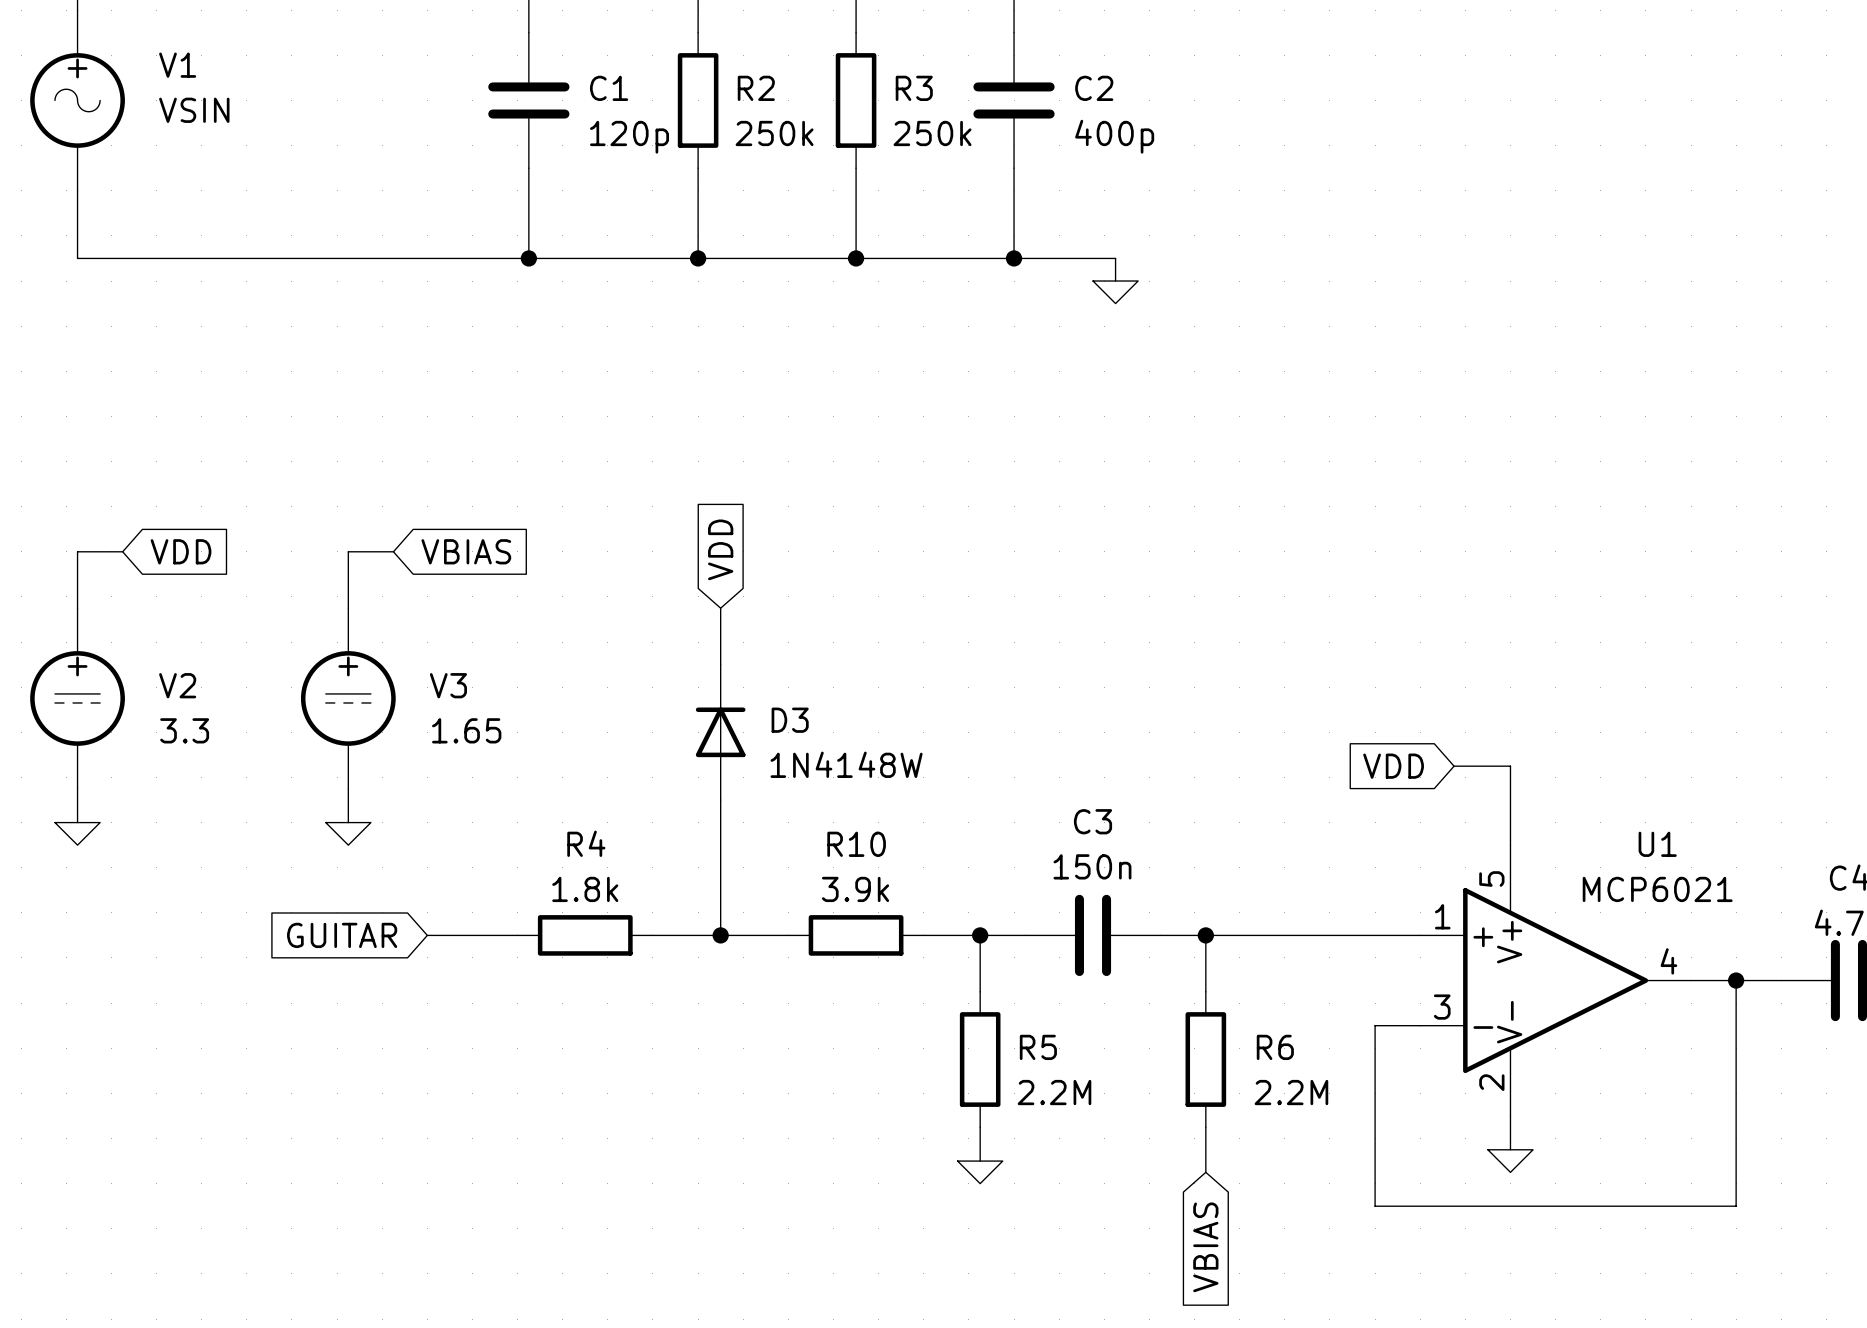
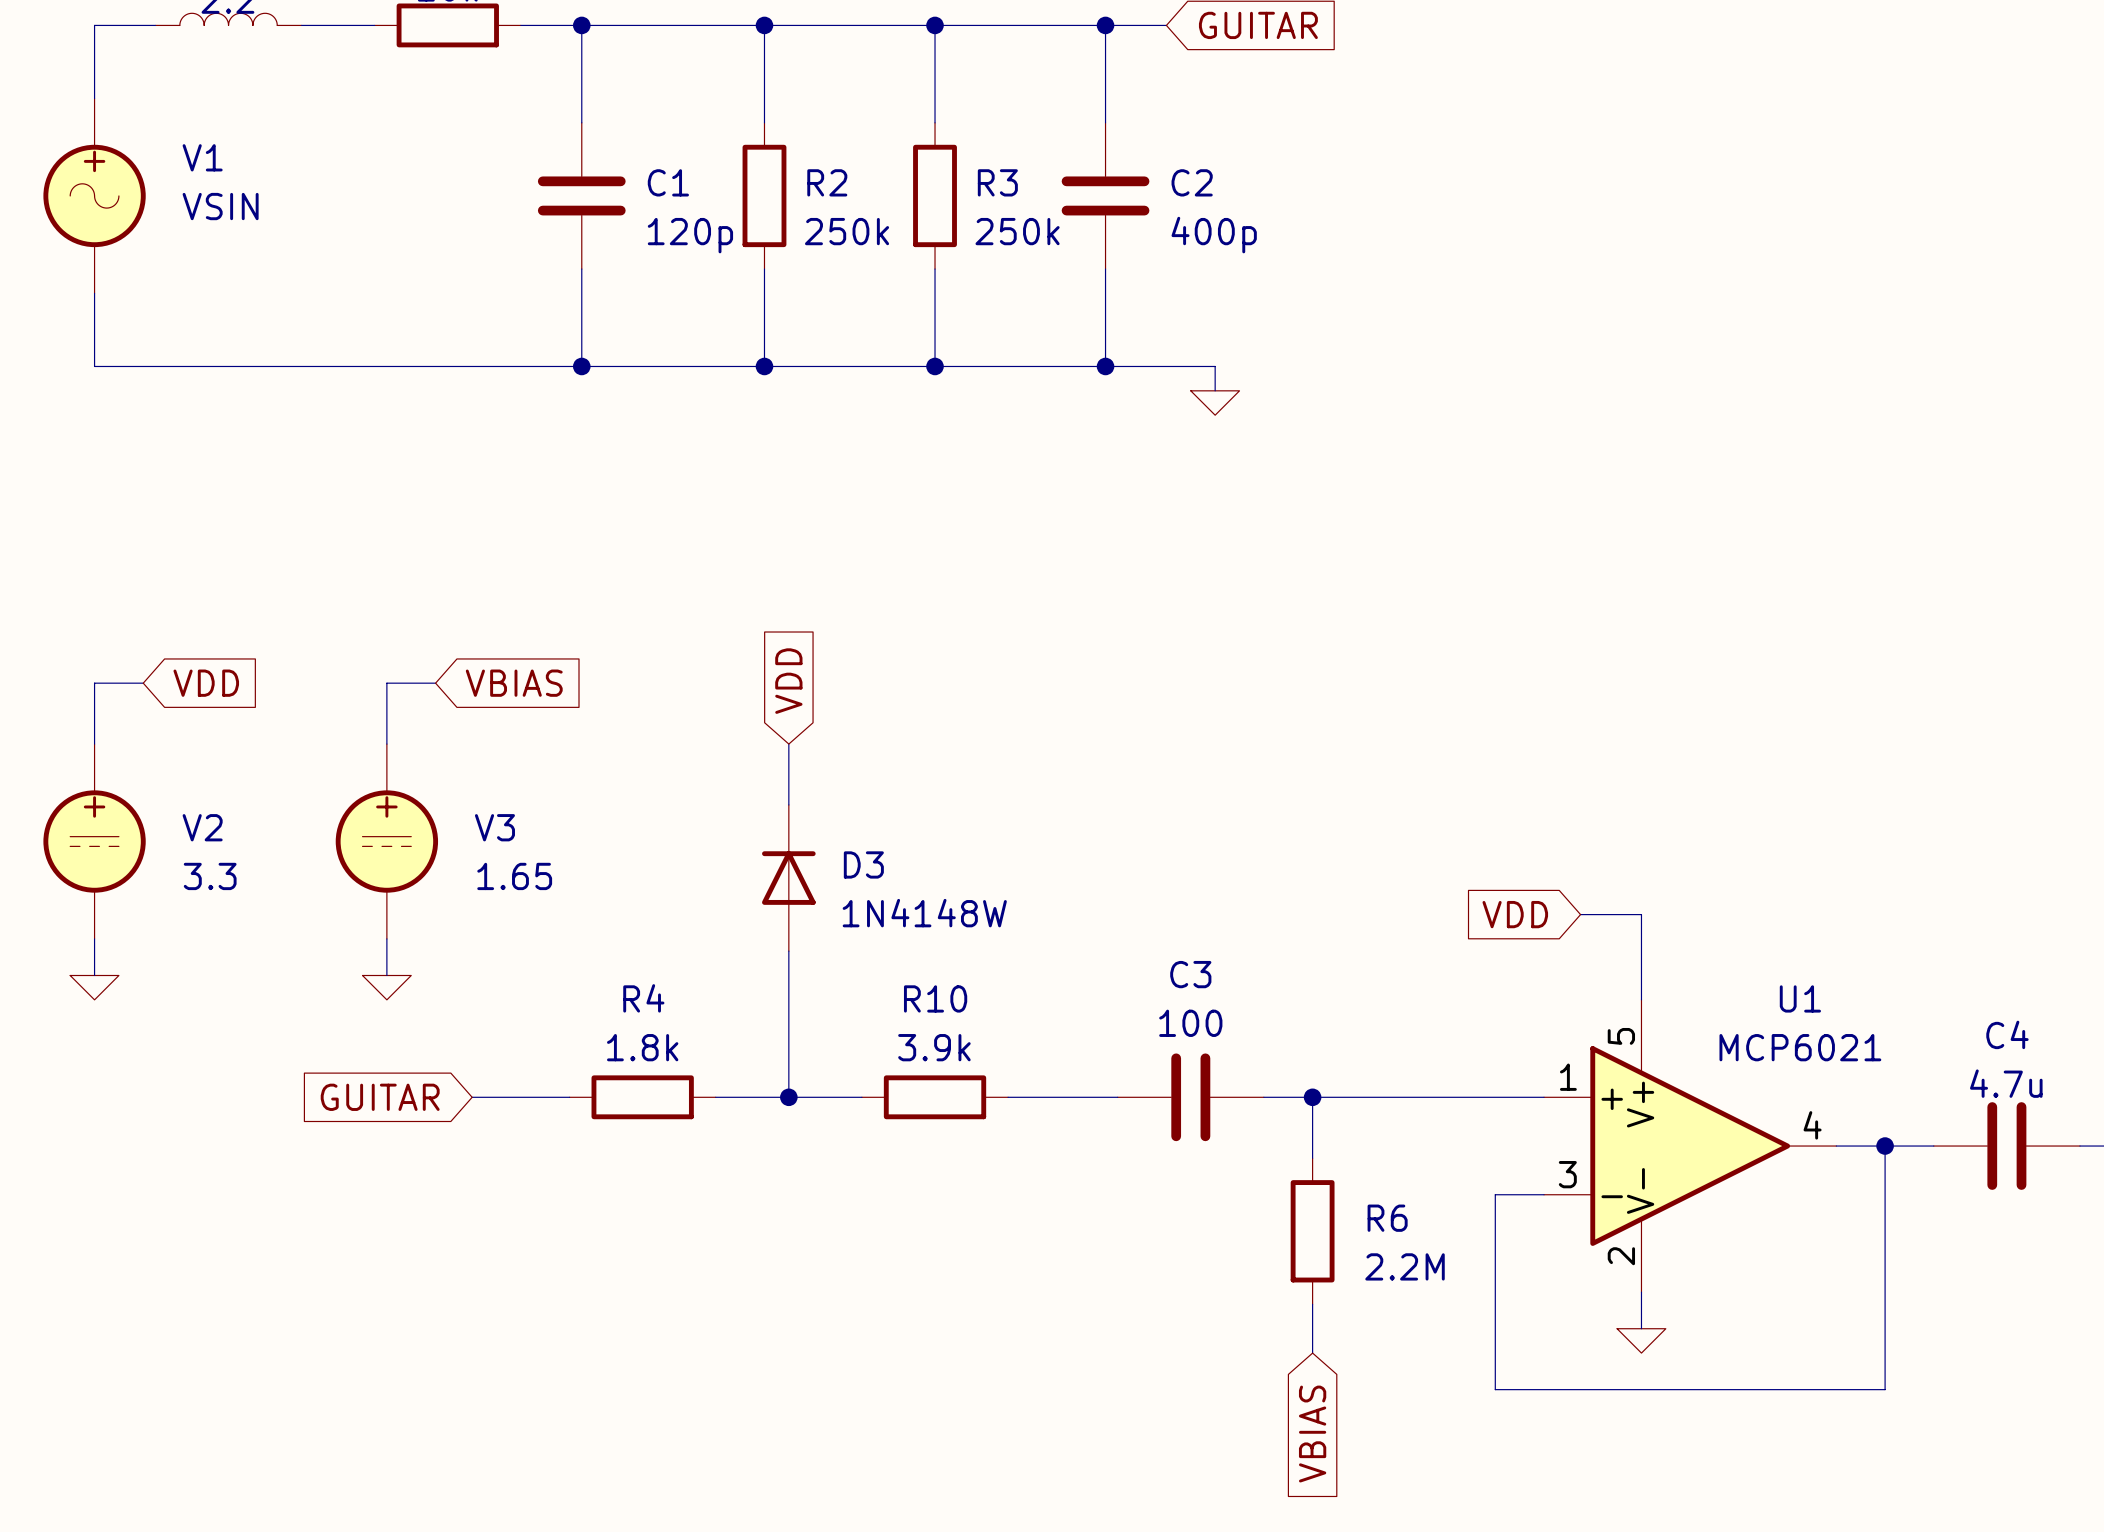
C3 value: 150n (1092, 866) -> 100 (1190, 1023)
wire: (980, 935) (980, 991) -> none
junction: (980, 935) -> none
R5: 2.2M (980, 1059) -> none
wire: (980, 1127) (980, 1161) -> none
power symbol: (980, 1172) -> none

